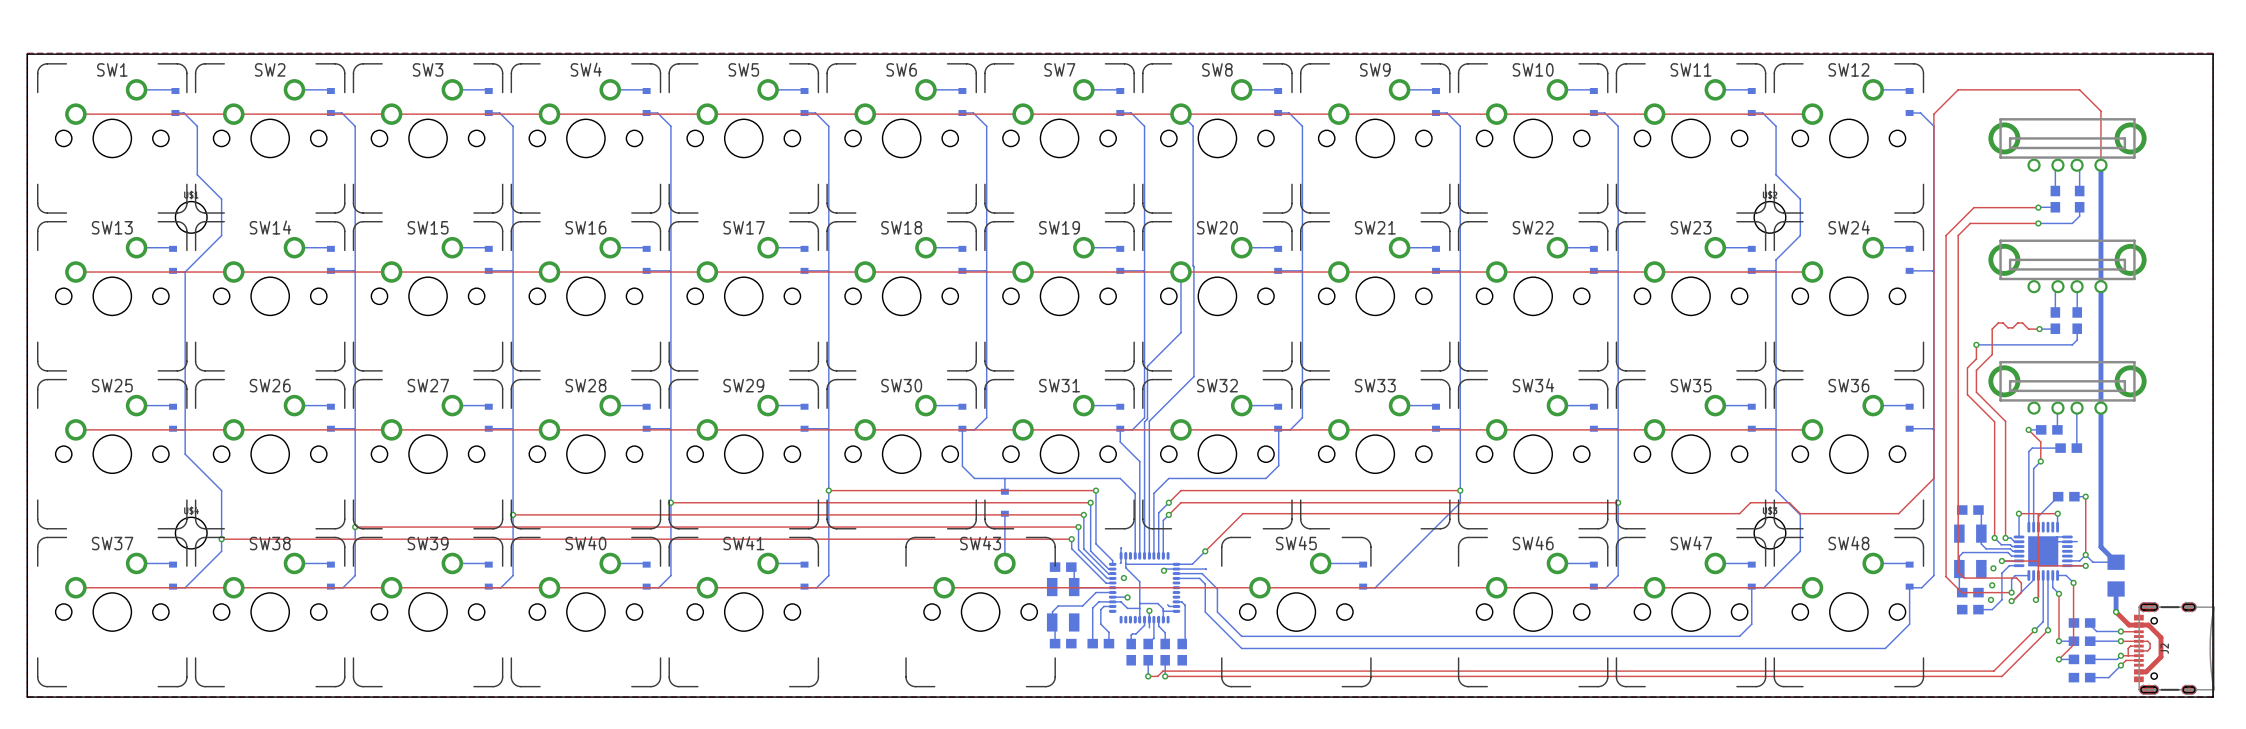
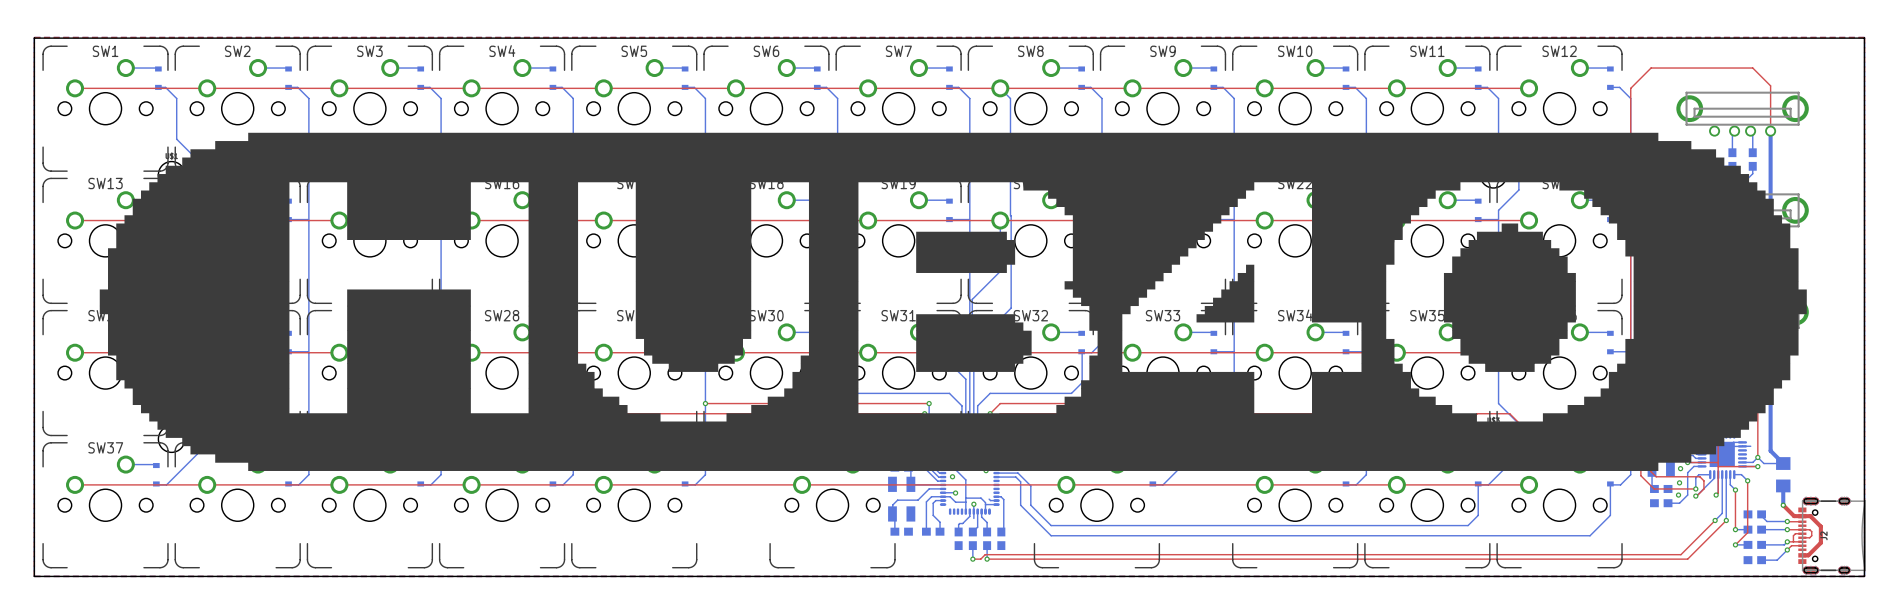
drawing: none -> [99, 132, 1807, 471]

